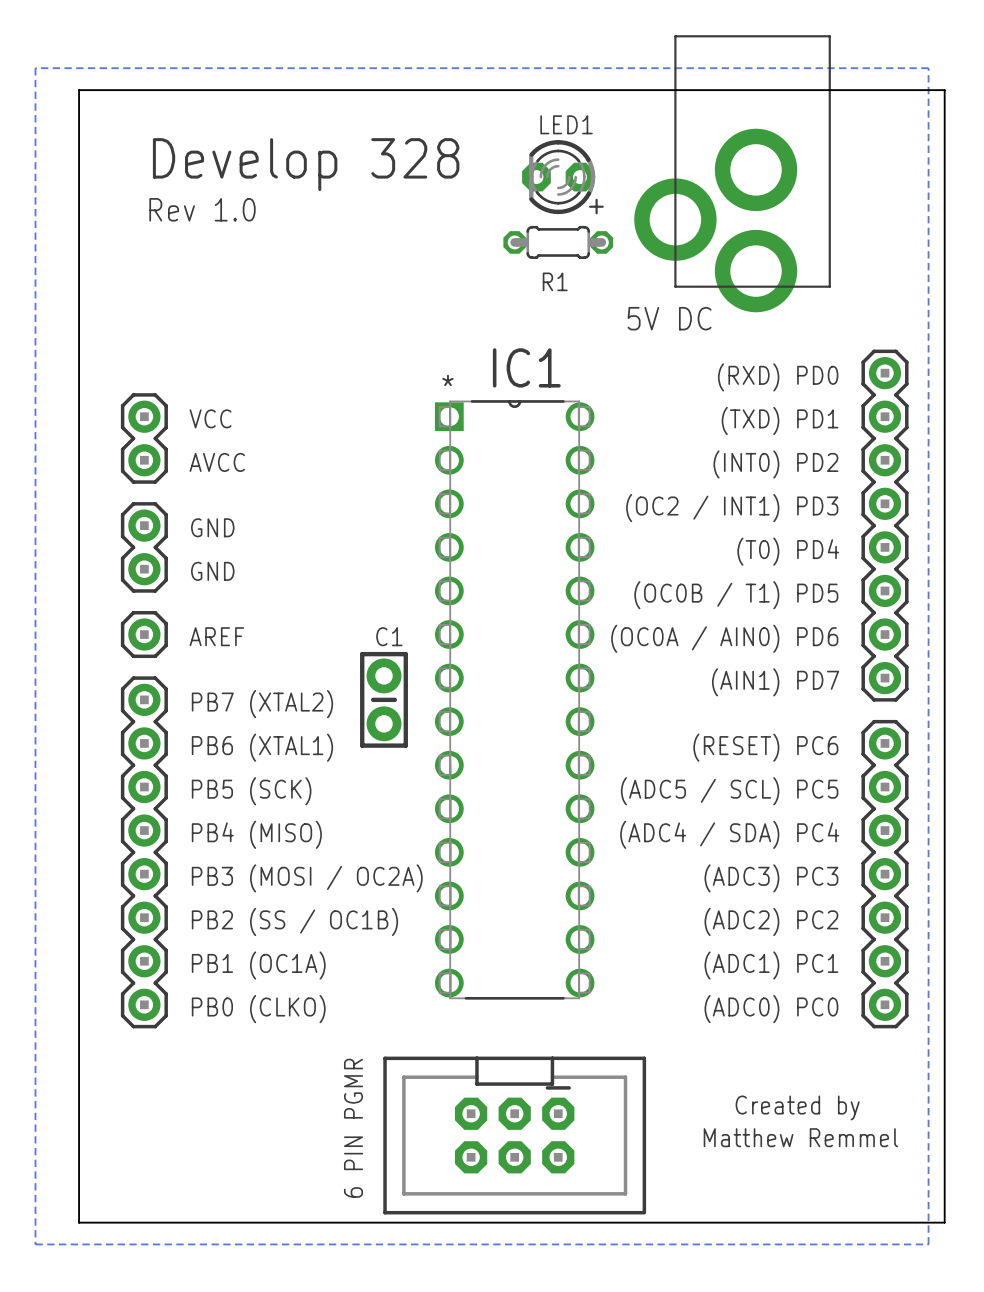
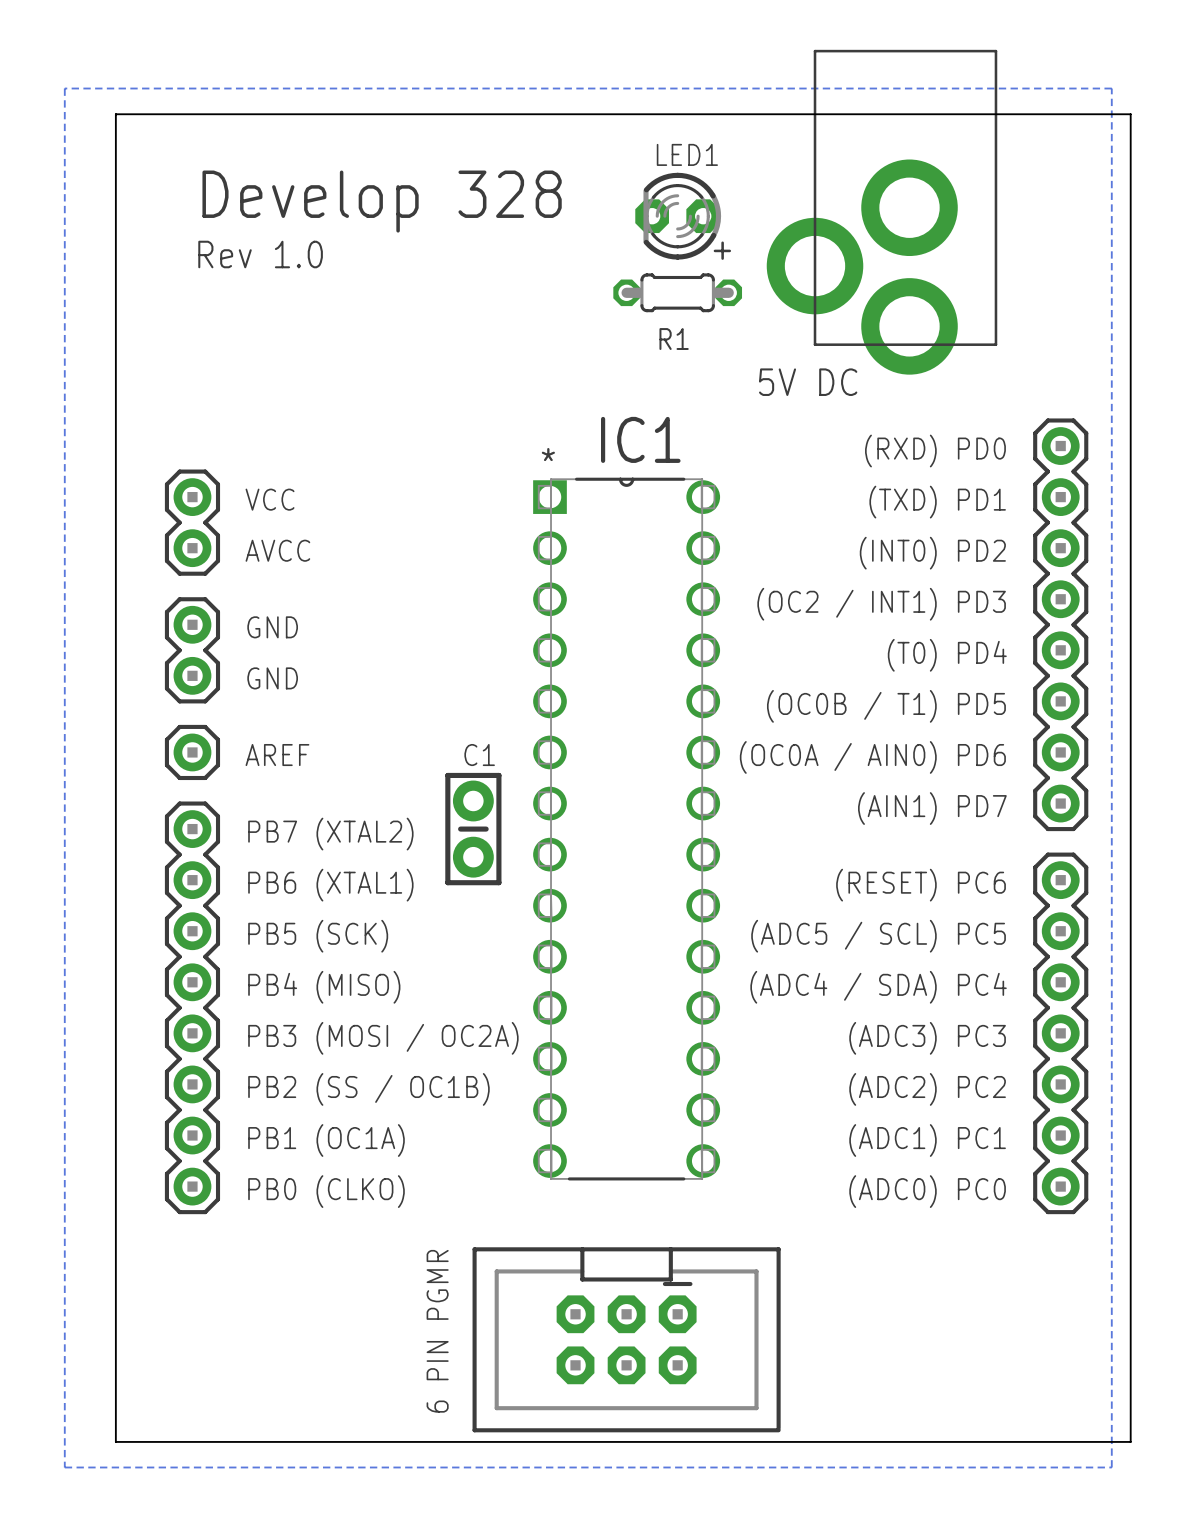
text: Created by (797, 1107) -> none
text: Matthew Remmel (800, 1137) -> none

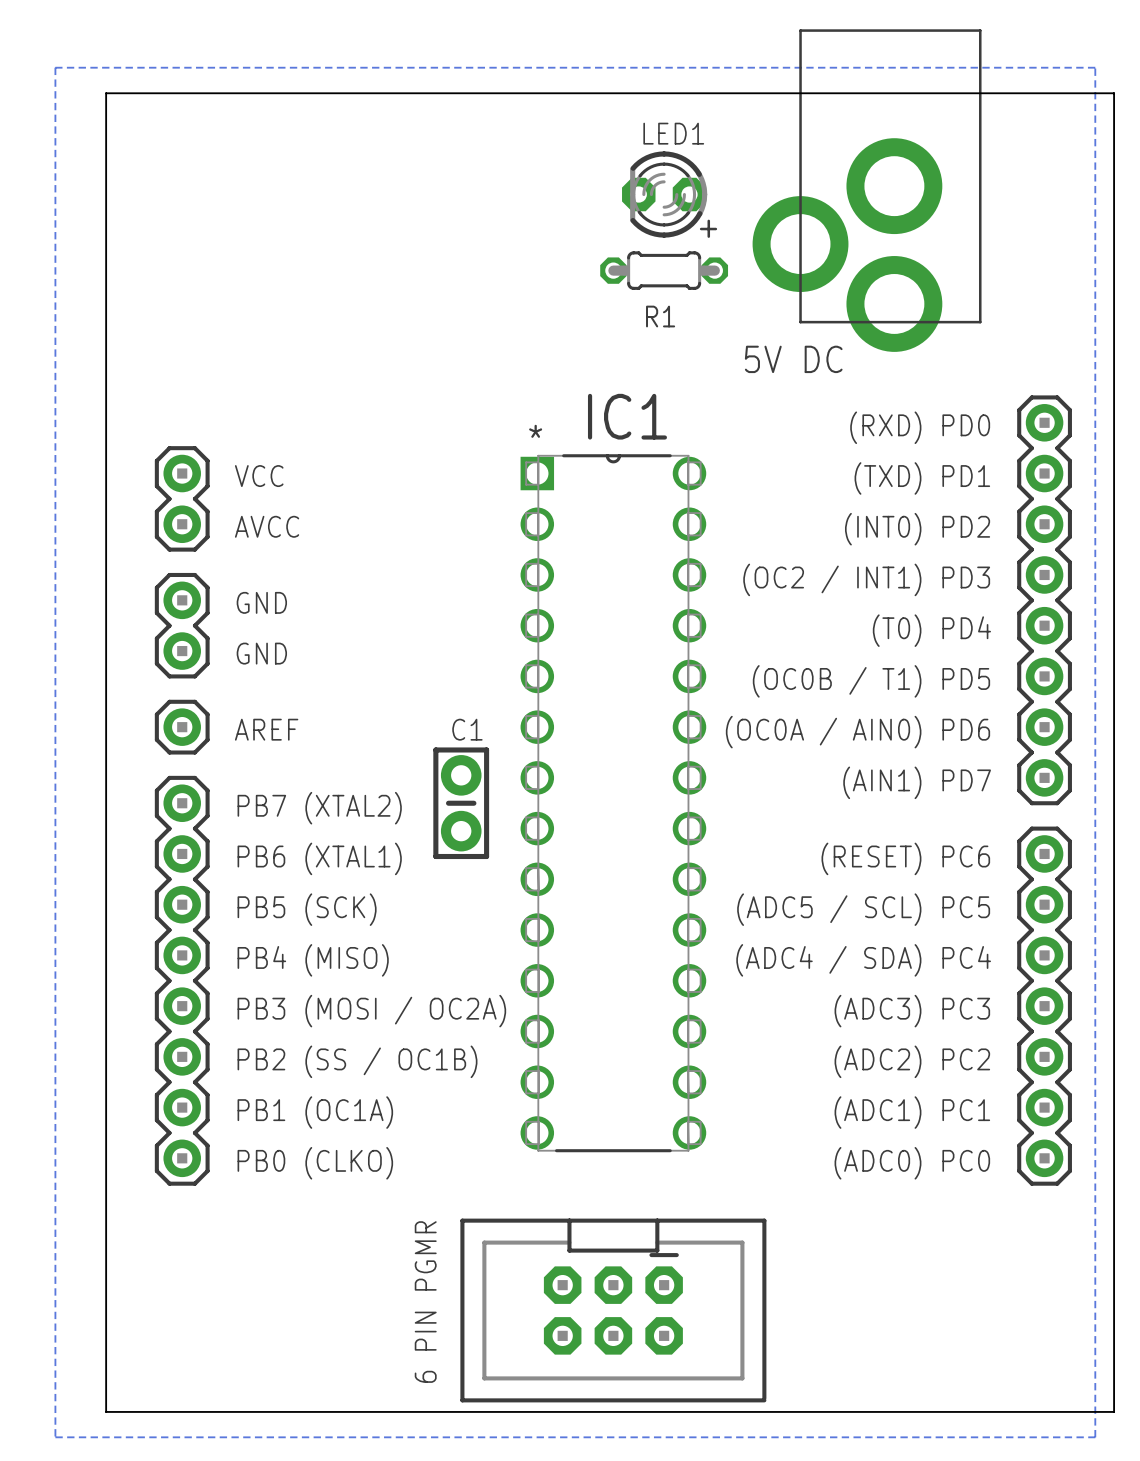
text: Develop 328 (382, 201) -> none
text: Rev 1.0 (260, 254) -> none

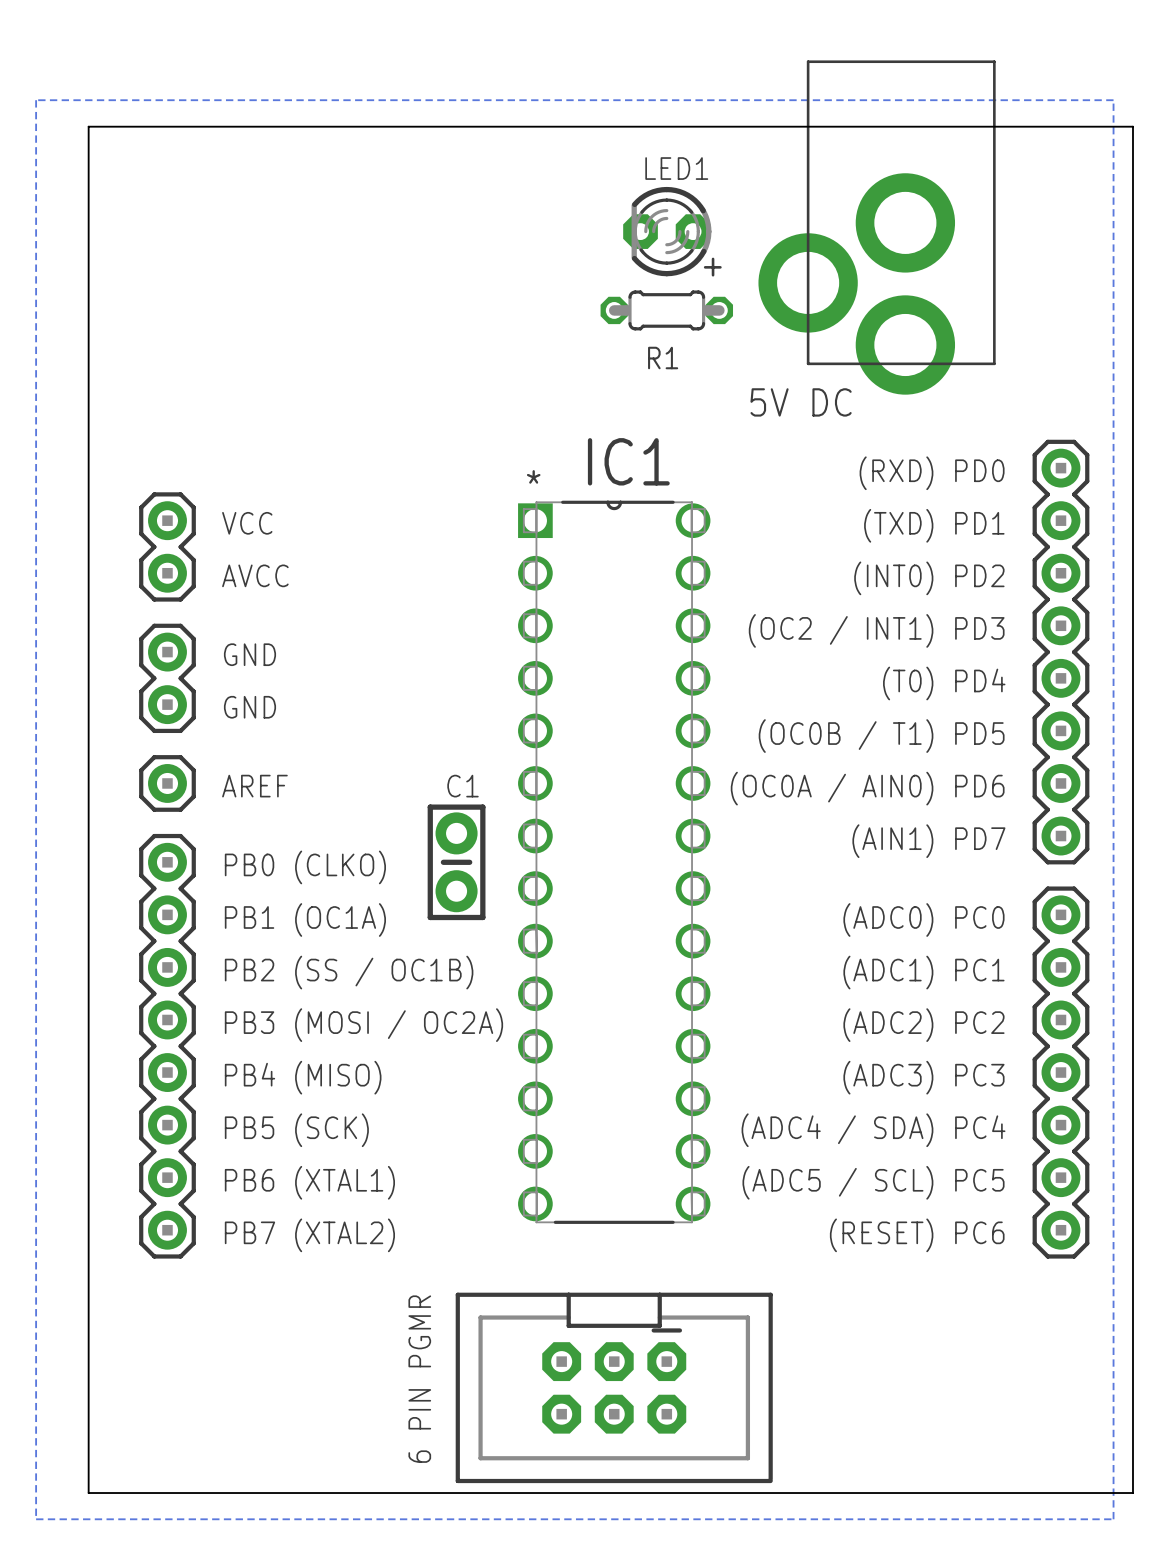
text: PB7 (XTAL2) (319, 808) -> PB0 (CLKO) (305, 867)
text: PB6 (XTAL1) (319, 858) -> PB1 (OC1A) (305, 919)
text: (RESET) PC6 (905, 858) -> (ADC0) PC0 (923, 919)
text: PB5 (SCK) (307, 909) -> PB2 (SS / OC1B) (349, 972)
text: (ADC5 / SCL) PC5 (863, 909) -> (ADC1) PC1 (923, 972)
text: PB4 (MISO) (313, 960) -> PB3 (MOSI / OC2A) (363, 1025)
text: (ADC4 / SDA) PC4 (863, 960) -> (ADC2) PC2 (923, 1025)
text: PB3 (MOSI / OC2A) (371, 1011) -> PB4 (MISO) (303, 1077)
text: PB2 (SS / OC1B) (357, 1061) -> PB5 (SCK) (296, 1130)
text: (ADC2) PC2 (912, 1061) -> (ADC4 / SDA) PC4 (873, 1130)
text: PB1 (OC1A) (315, 1112) -> PB6 (XTAL1) (309, 1182)
text: (ADC1) PC1 (912, 1112) -> (ADC5 / SCL) PC5 (873, 1182)
text: PB0 (CLKO) (315, 1163) -> PB7 (XTAL2) (309, 1235)
text: (ADC0) PC0 (912, 1163) -> (RESET) PC6 (917, 1235)

